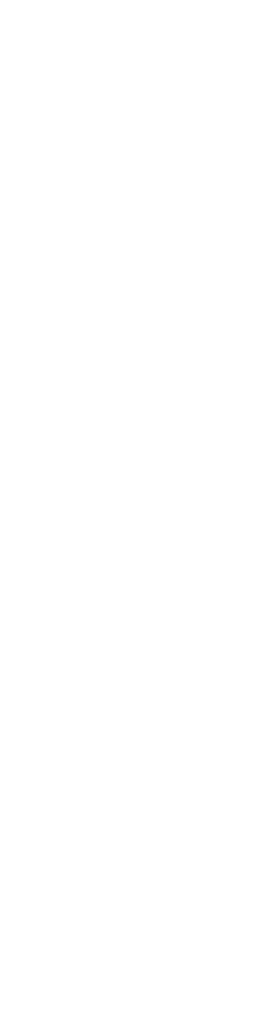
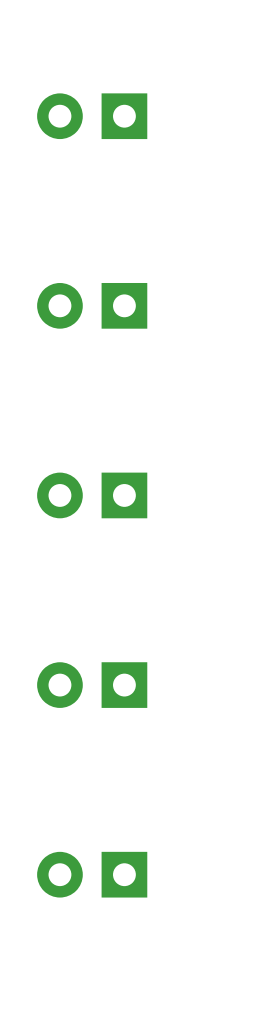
part: none -> (92, 116)
part: none -> (92, 305)
part: none -> (92, 495)
part: none -> (92, 685)
part: none -> (92, 874)

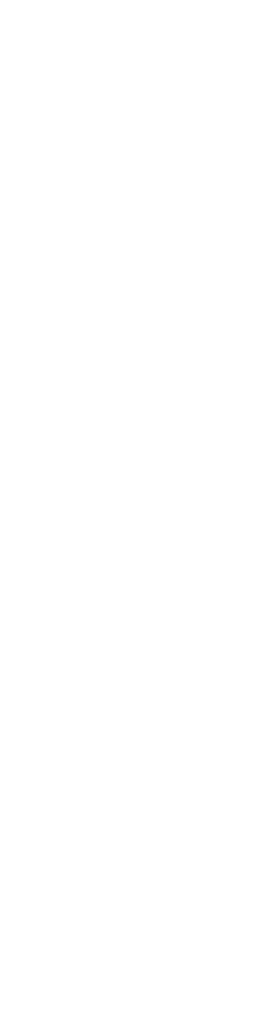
part: (92, 116) -> none
part: (92, 305) -> none
part: (92, 495) -> none
part: (92, 685) -> none
part: (92, 874) -> none

